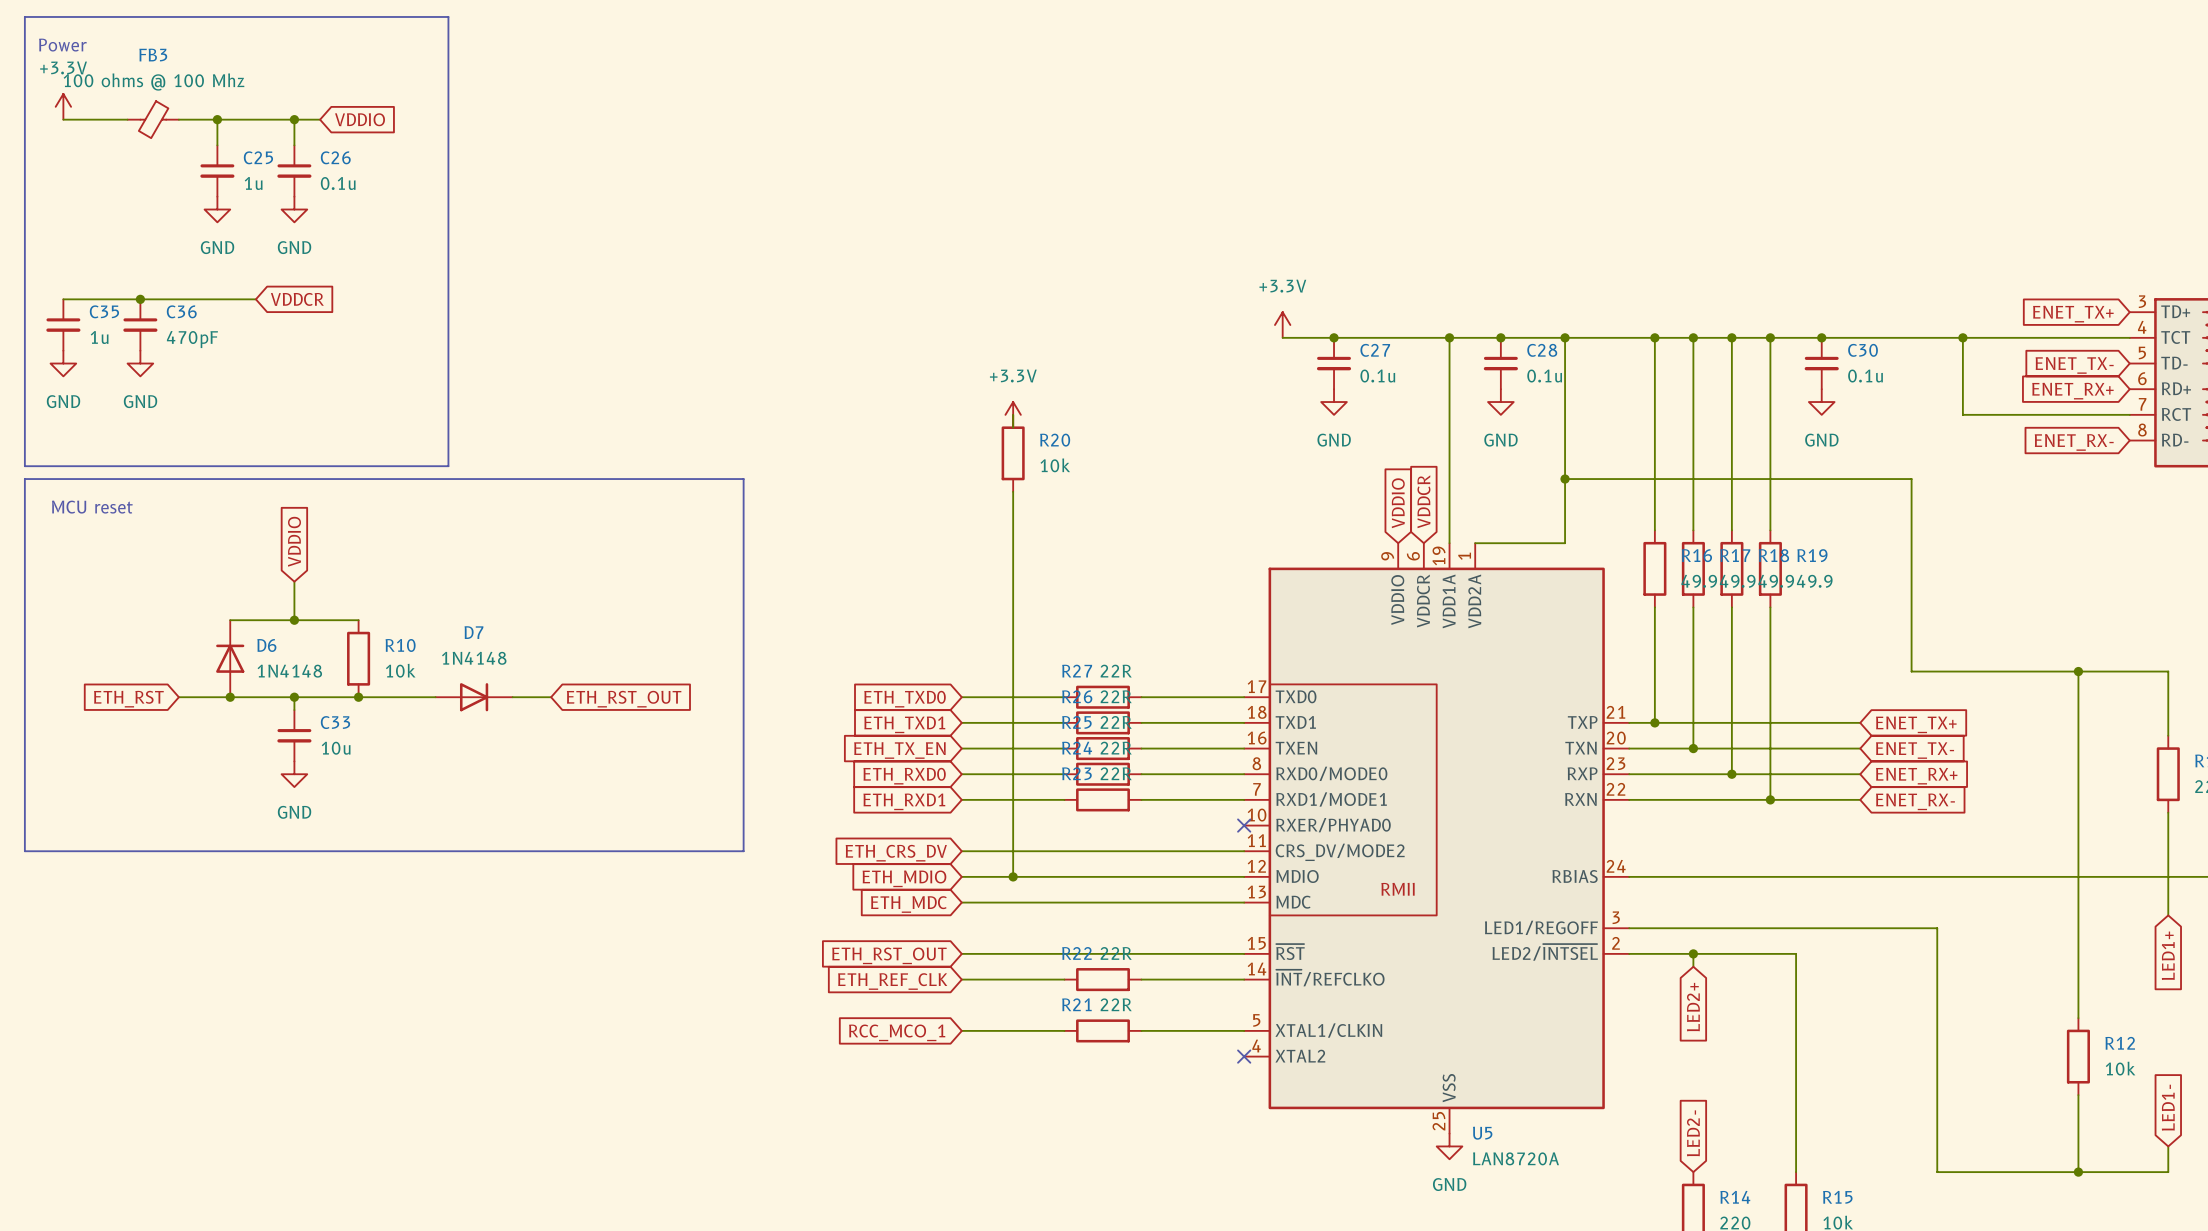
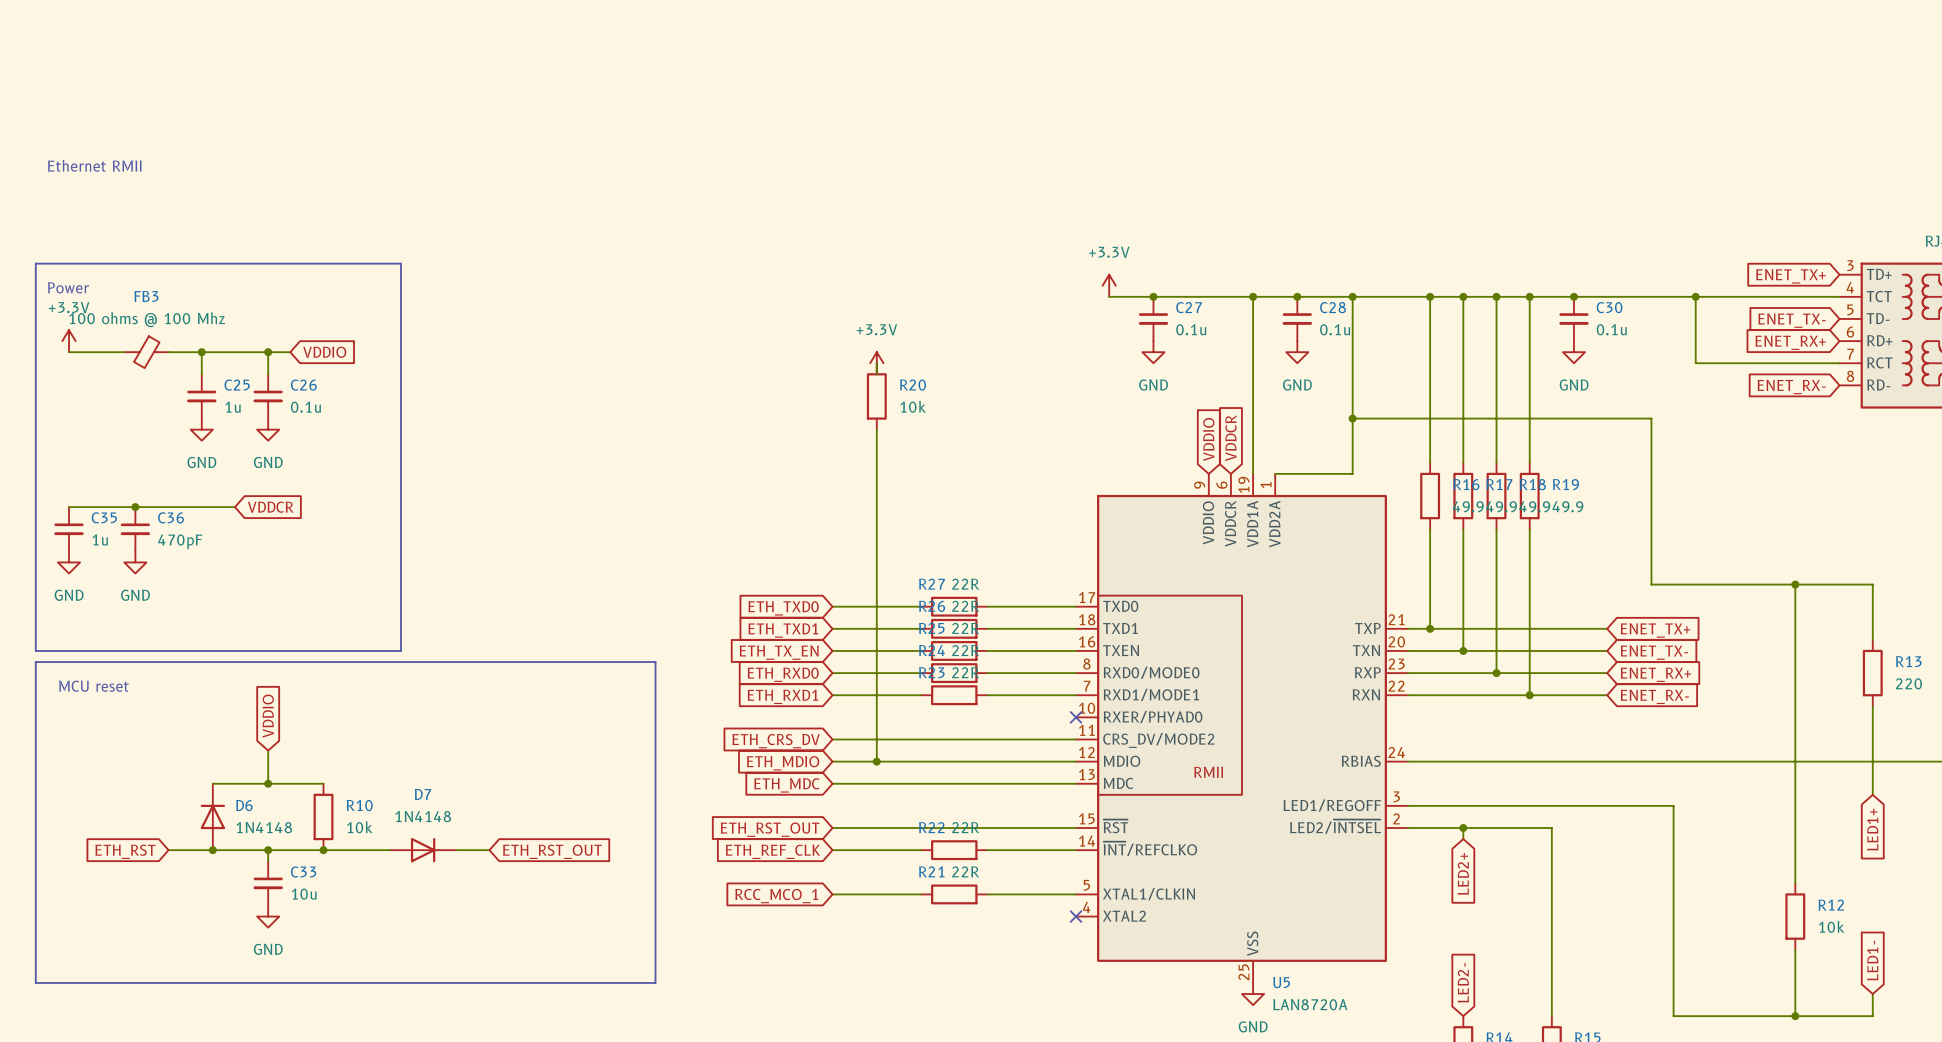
line: (24, 16) (448, 16) (448, 466) (24, 466) (24, 16) -> none
text: Power (62, 45) -> none
power symbol: +3.3V (63, 106) -> none
wire: (63, 119) (127, 119) -> none
FB3 position: (153, 119) -> (146, 352)
wire: (178, 119) (320, 119) -> none
wire: (217, 119) (217, 145) -> none
junction: (217, 119) -> none
wire: (294, 119) (294, 145) -> none
junction: (294, 119) -> none
global label: VDDIO (360, 119) -> none
C25 position: (217, 171) -> (201, 396)
C26 position: (294, 171) -> (268, 396)
text: none -> Ethernet RMII (94, 165)
power symbol: GND (217, 209) -> none
power symbol: GND (294, 209) -> none
line: none -> (35, 263) (400, 263) (400, 650) (35, 650) (35, 263)
junction: (140, 299) -> none
global label: VDDCR (297, 299) -> none
C35 position: (63, 325) -> (68, 529)
C36 position: (140, 325) -> (135, 529)
text: none -> Power (68, 287)
power symbol: GND (63, 363) -> none
power symbol: GND (140, 363) -> none
power symbol: none -> +3.3V (68, 341)
wire: none -> (68, 352) (124, 352)
wire: none -> (168, 352) (290, 352)
wire: none -> (201, 352) (201, 374)
junction: none -> (201, 352)
wire: none -> (268, 352) (268, 374)
junction: none -> (268, 352)
global label: none -> VDDIO (324, 352)
line: (24, 479) (24, 851) (743, 851) (743, 479) (24, 479) -> none
power symbol: none -> GND (201, 429)
power symbol: none -> GND (268, 429)
text: MCU reset (92, 507) -> none
global label: VDDIO (294, 541) -> none
wire: none -> (68, 507) (234, 507)
junction: none -> (135, 507)
wire: (294, 581) (294, 620) -> none
global label: none -> VDDCR (270, 507)
wire: (230, 620) (358, 620) -> none
junction: (294, 620) -> none
power symbol: none -> GND (68, 562)
power symbol: none -> GND (135, 562)
D6 position: (230, 658) -> (212, 816)
R10 position: (358, 658) -> (323, 816)
wire: (178, 697) (435, 697) -> none
junction: (230, 697) -> none
wire: (294, 697) (294, 710) -> none
junction: (294, 697) -> none
junction: (358, 697) -> none
D7 position: (474, 697) -> (423, 850)
wire: (512, 697) (551, 697) -> none
global label: ETH_RST (128, 699) -> none
global label: ETH_RST_OUT (624, 699) -> none
C33 position: (294, 735) -> (268, 883)
line: none -> (35, 662) (35, 982) (655, 982) (655, 662) (35, 662)
power symbol: GND (294, 774) -> none
text: none -> MCU reset (93, 686)
global label: none -> VDDIO (268, 716)
wire: none -> (268, 750) (268, 783)
wire: none -> (212, 783) (323, 783)
junction: none -> (268, 783)
wire: none -> (168, 850) (389, 850)
junction: none -> (212, 850)
wire: none -> (268, 850) (268, 861)
junction: none -> (268, 850)
junction: none -> (323, 850)
wire: none -> (456, 850) (489, 850)
global label: none -> ETH_RST (125, 851)
global label: none -> ETH_RST_OUT (552, 851)
power symbol: none -> GND (268, 916)

